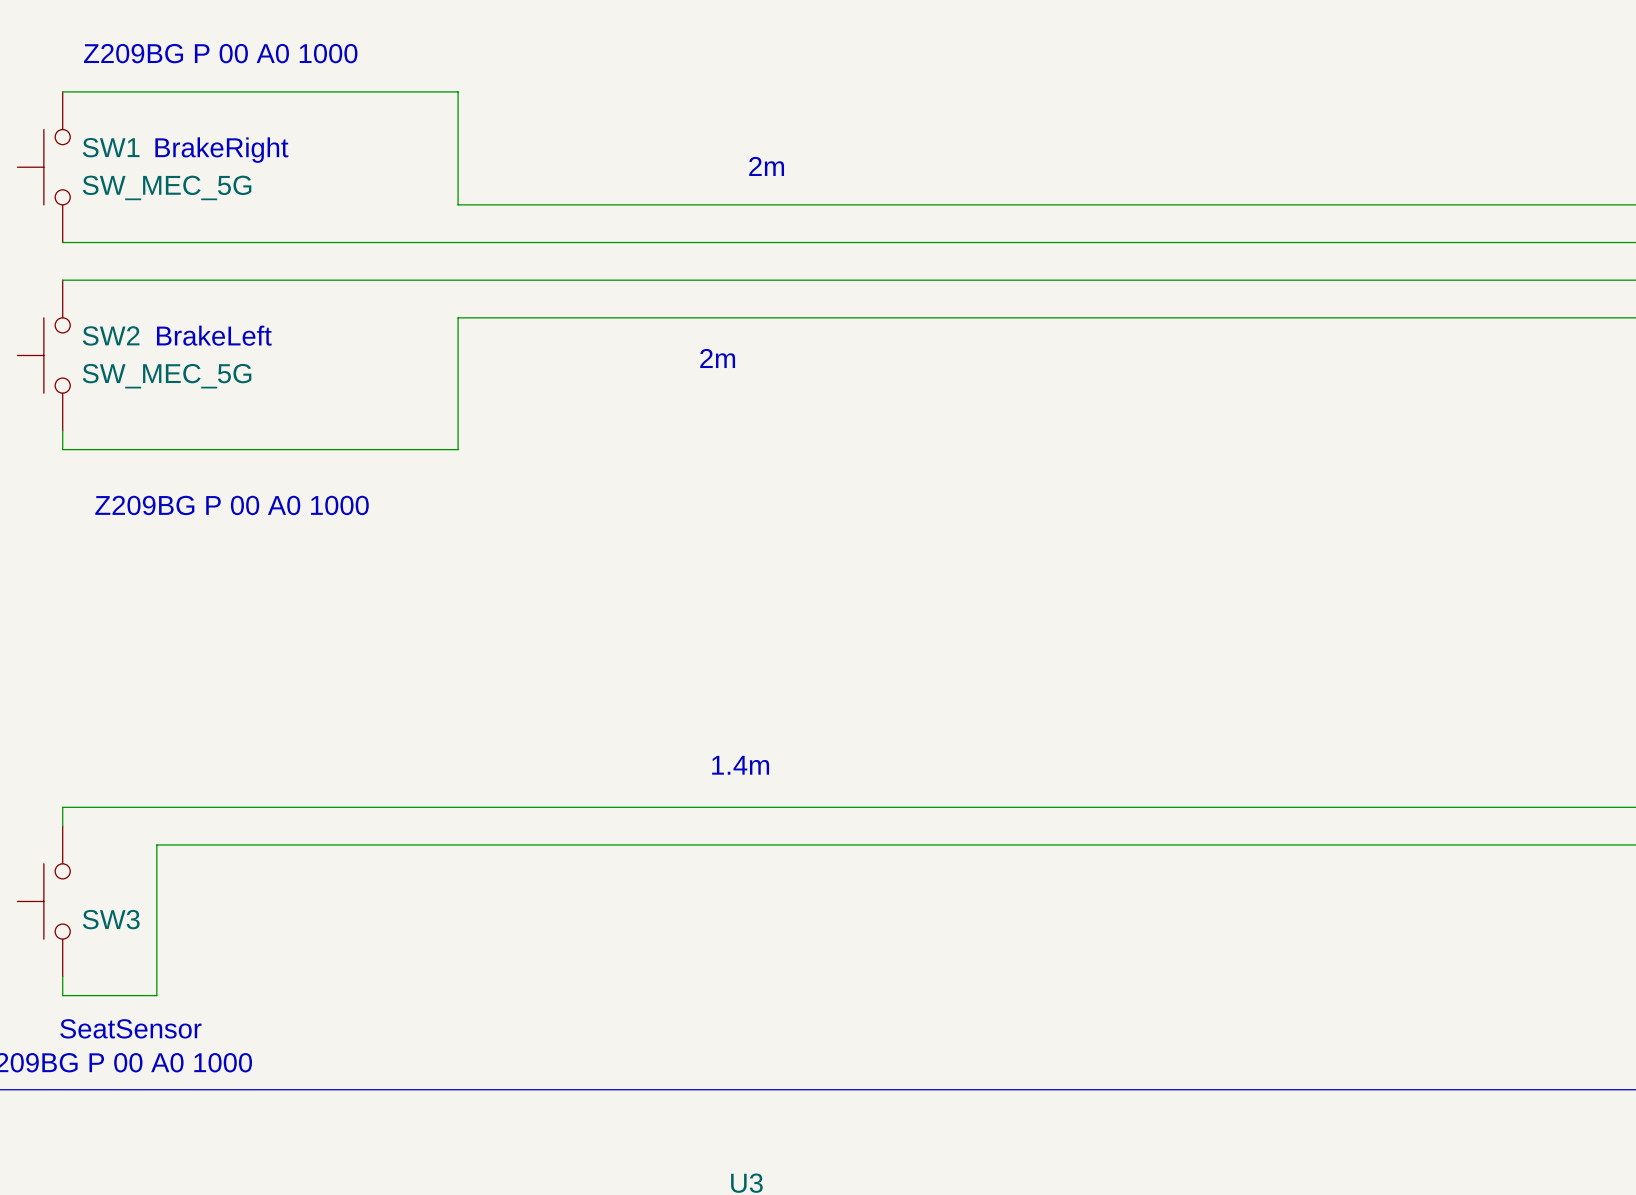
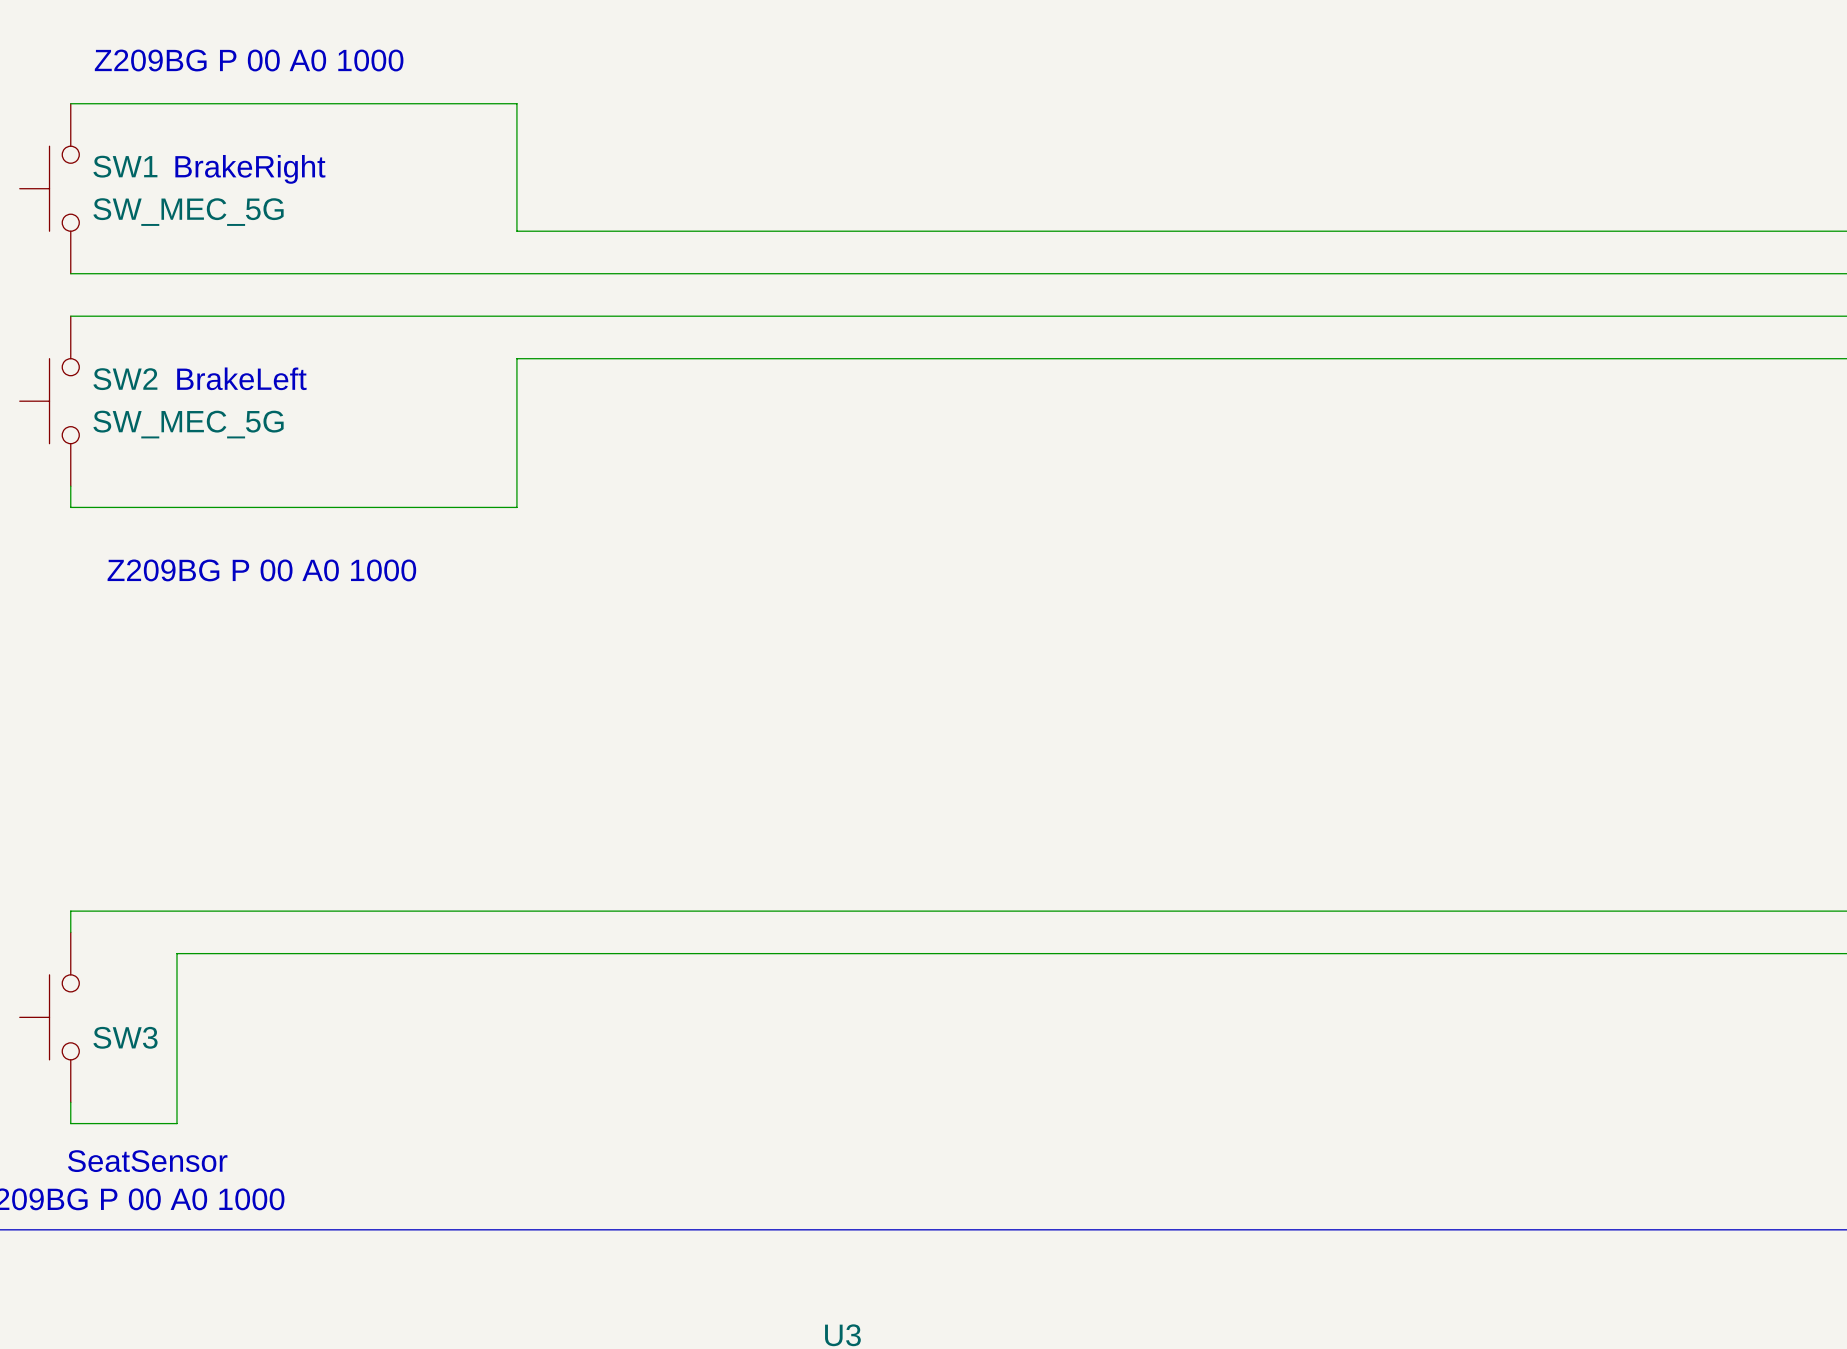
text: 2m (766, 166) -> none
text: 2m (717, 358) -> none
text: 1.4m (740, 765) -> none

